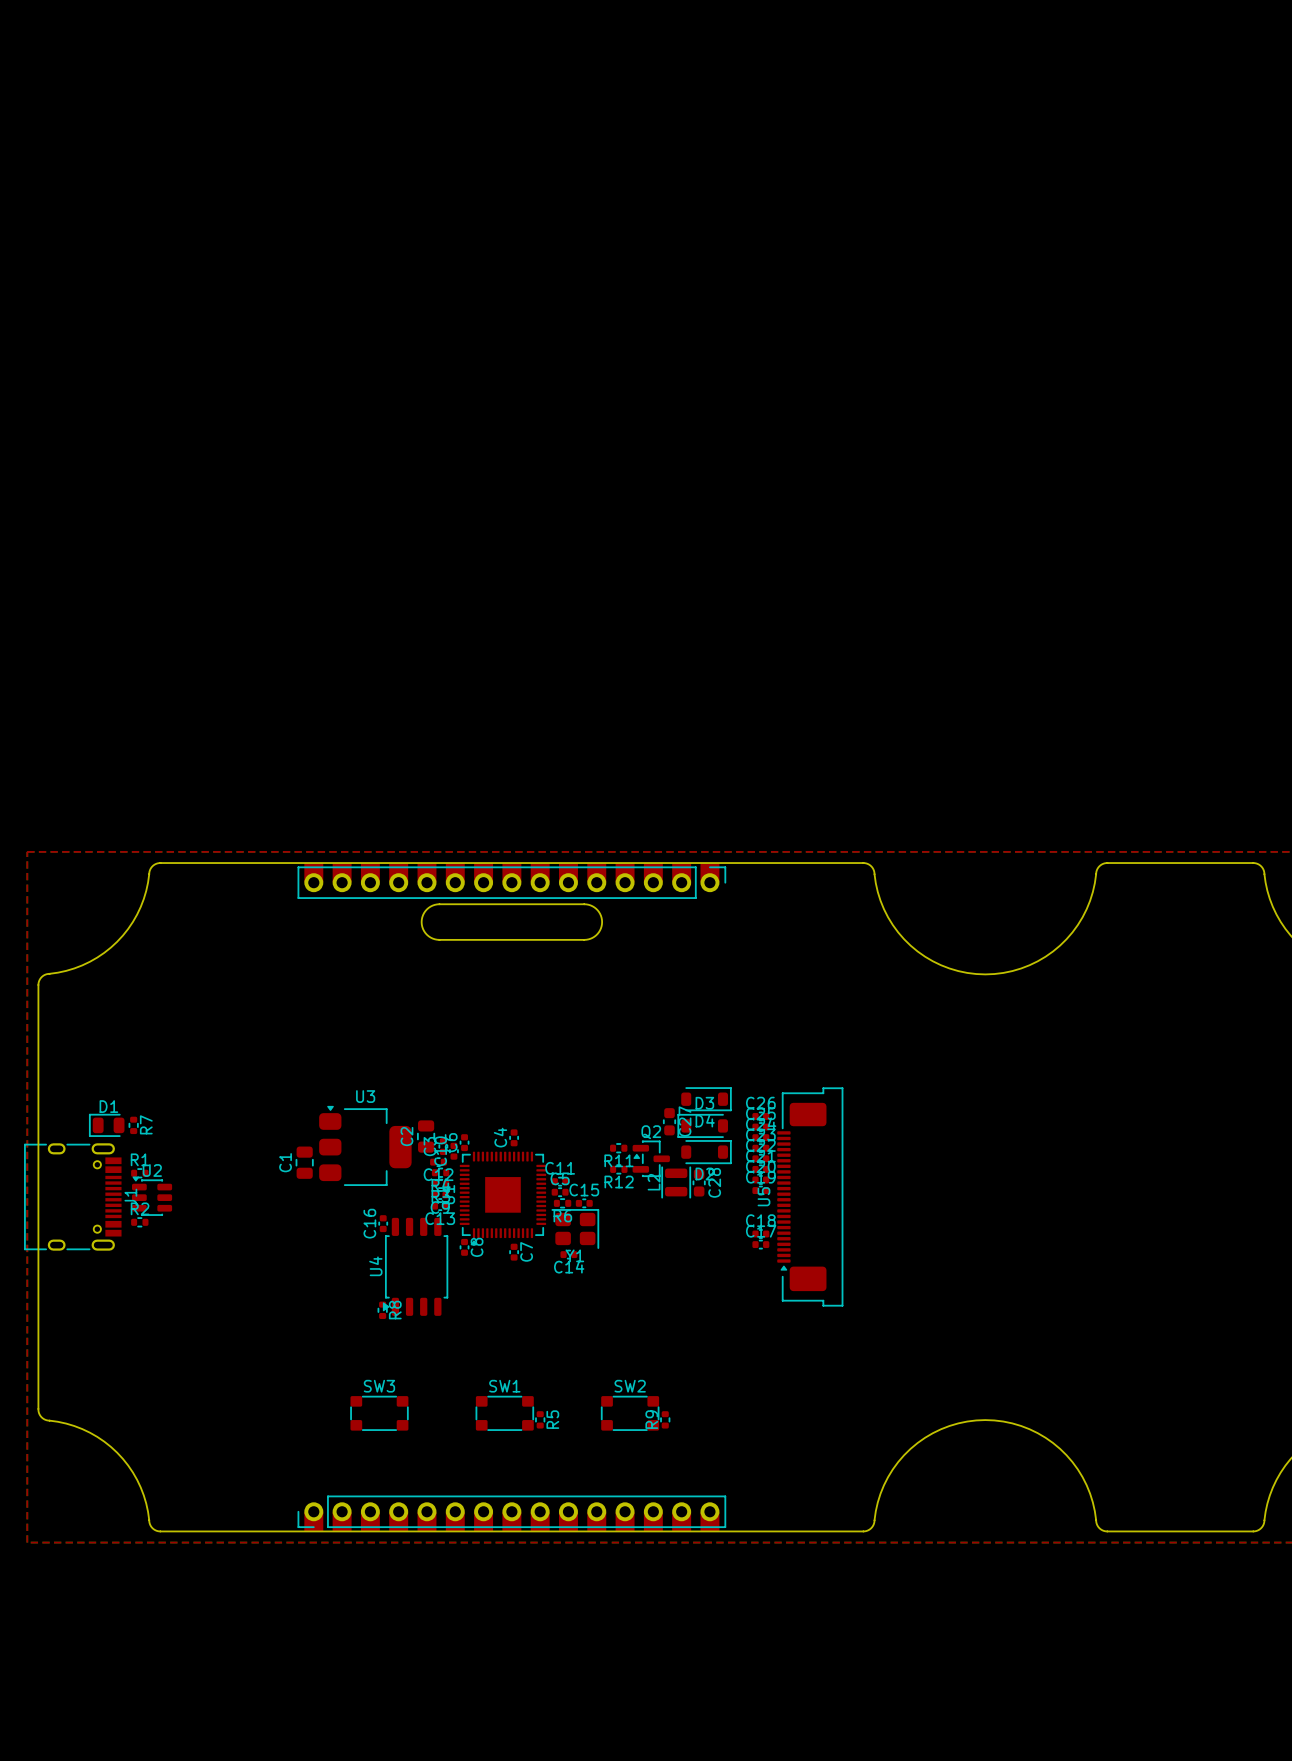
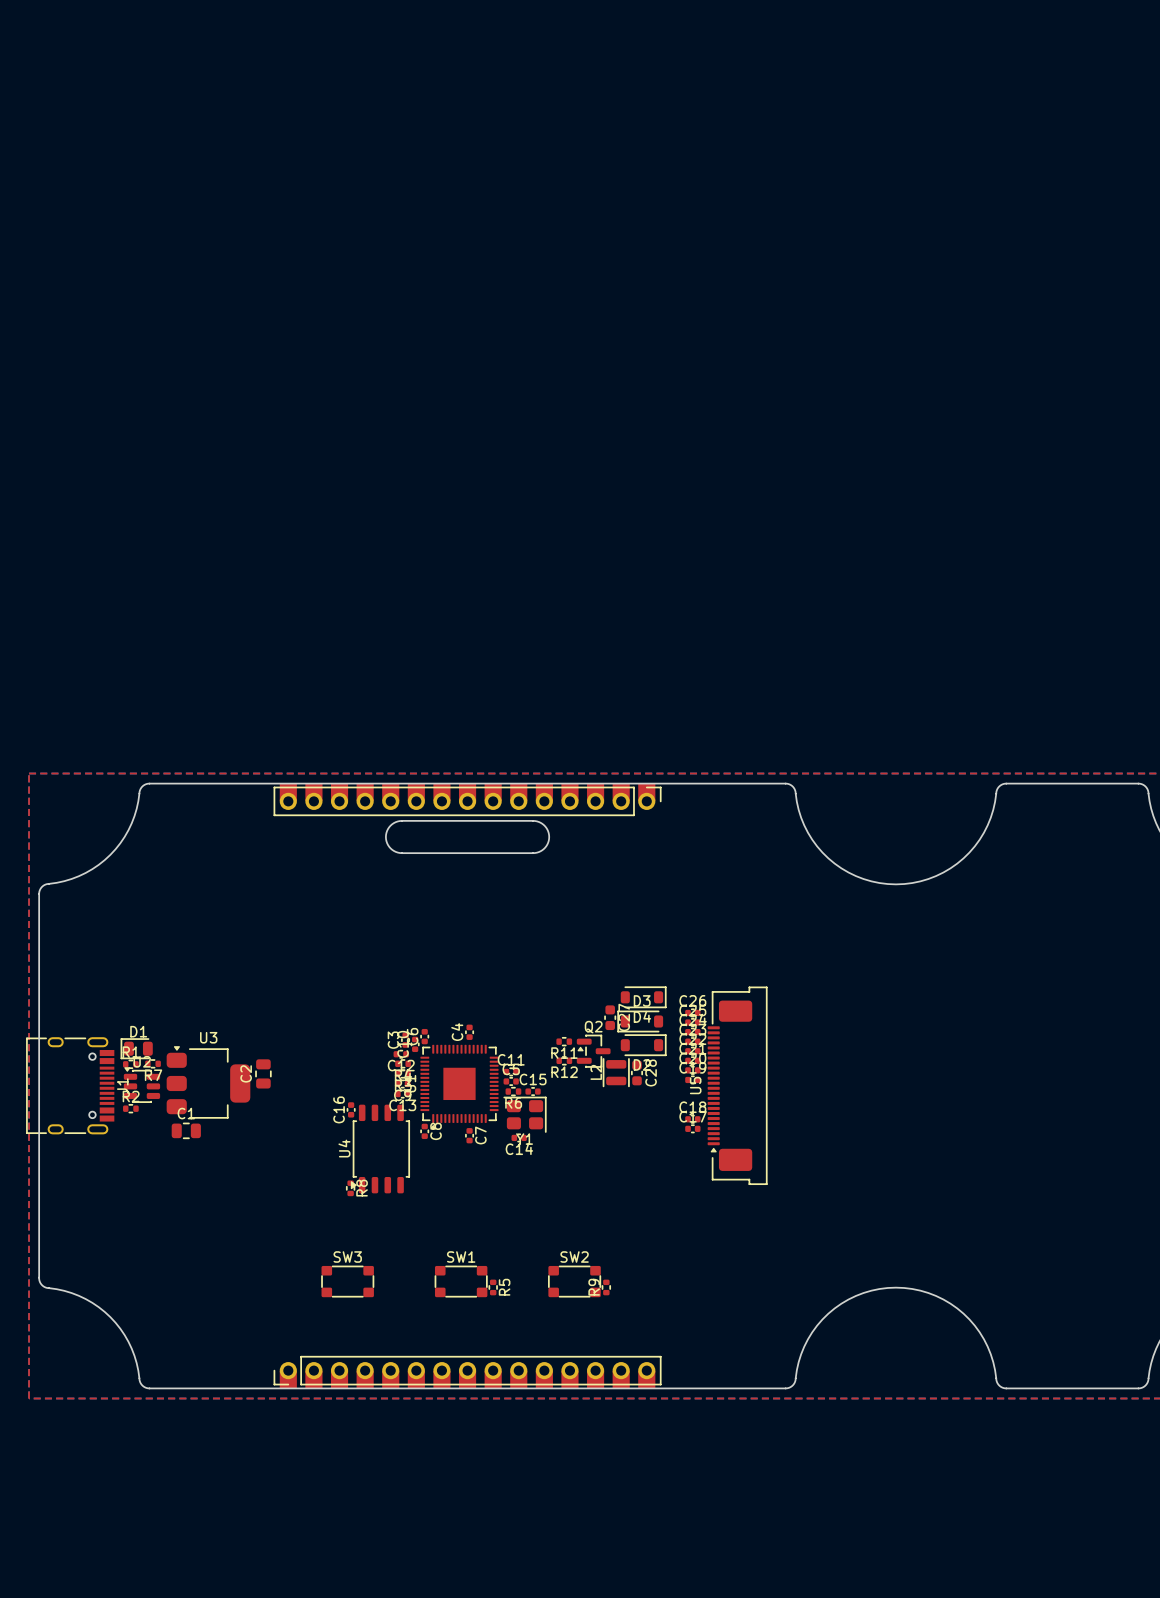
D1 position: (106, 1125) -> (136, 1048)
R7 rotation: 0° (133, 1125) -> 90° clockwise (153, 1063)
R7 position: (133, 1125) -> (153, 1063)
C2 position: (426, 1136) -> (263, 1073)
U3 position: (365, 1145) -> (208, 1082)
C1 rotation: 0° (304, 1162) -> 90° clockwise (186, 1130)
C1 position: (304, 1162) -> (186, 1130)

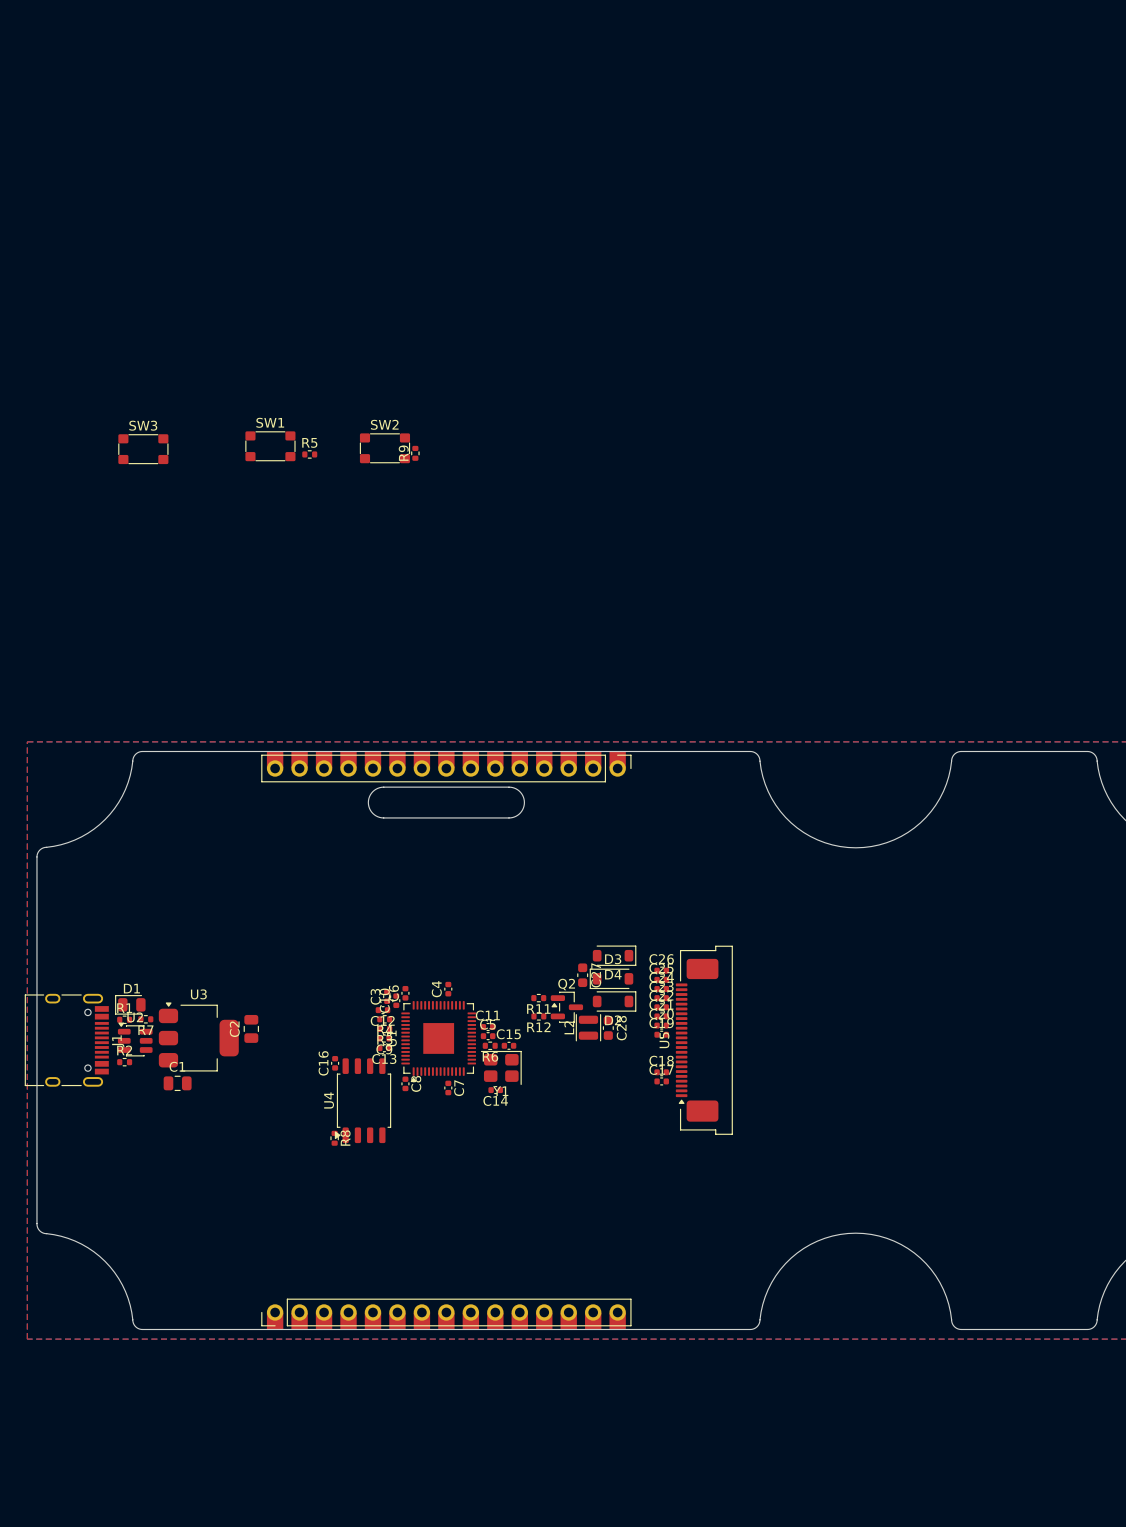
SW3 position: (347, 1281) -> (143, 449)
SW1 position: (461, 1281) -> (270, 446)
SW2 position: (574, 1281) -> (384, 448)
R5 rotation: 0° (493, 1287) -> 90° clockwise (309, 454)
R5 position: (493, 1287) -> (309, 454)
R9 position: (606, 1287) -> (415, 453)

